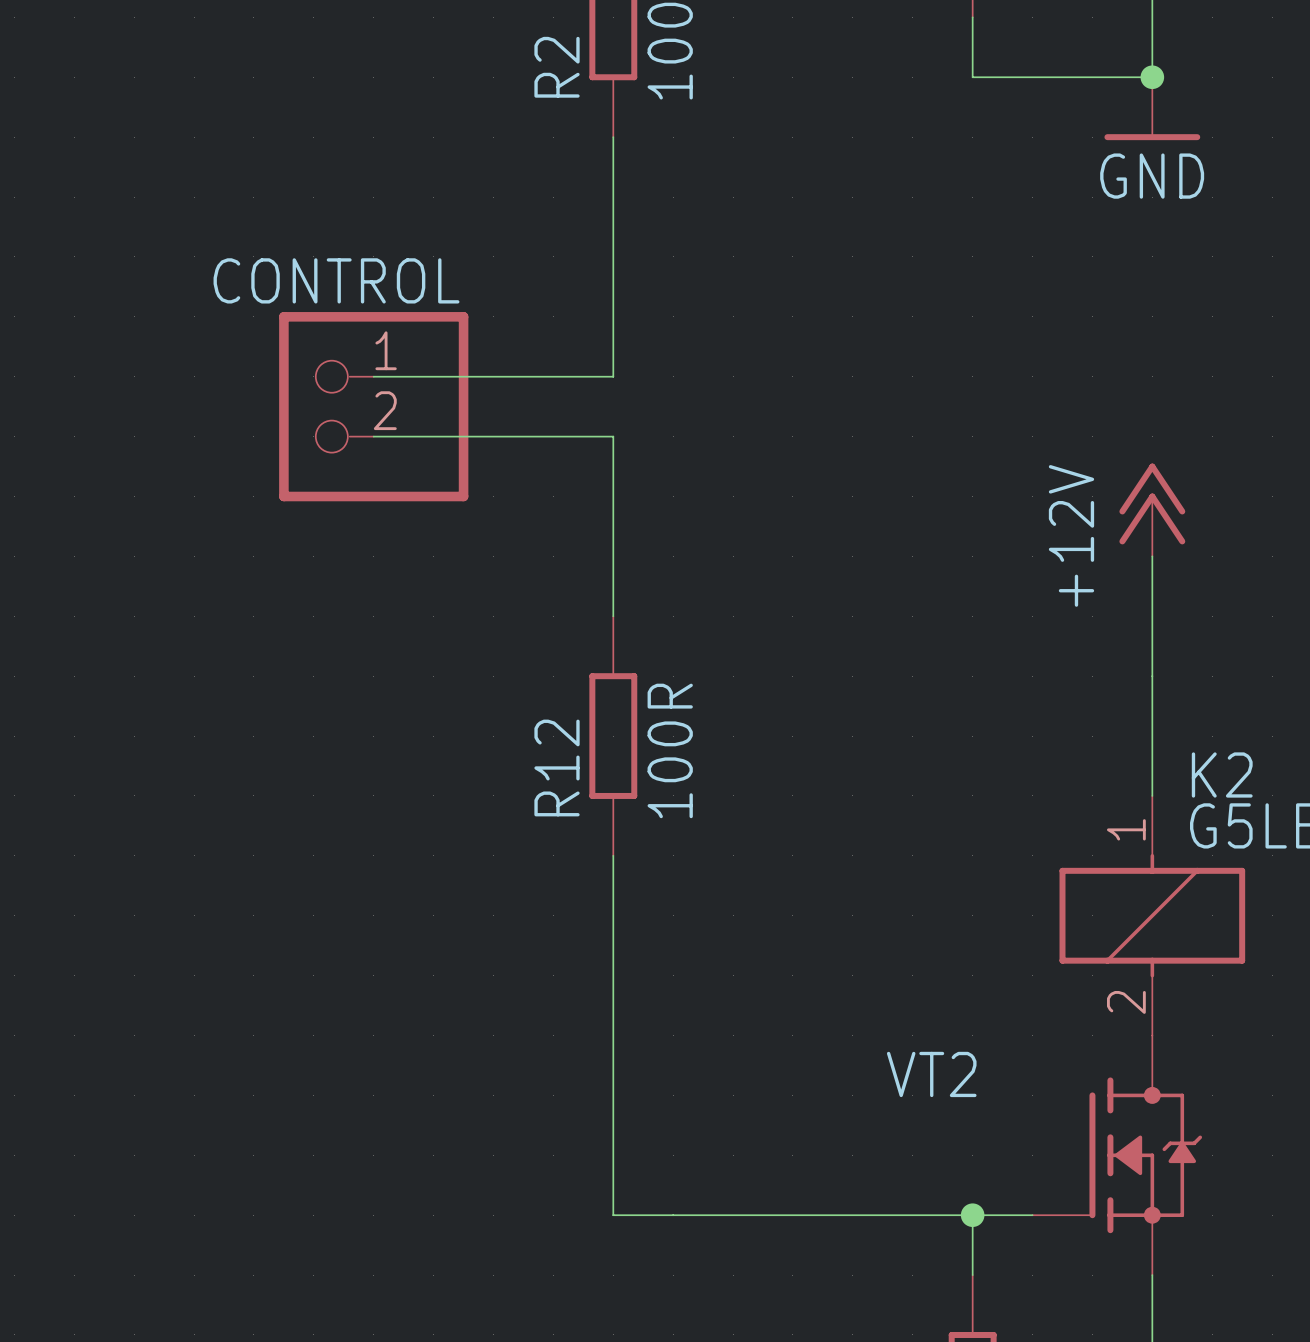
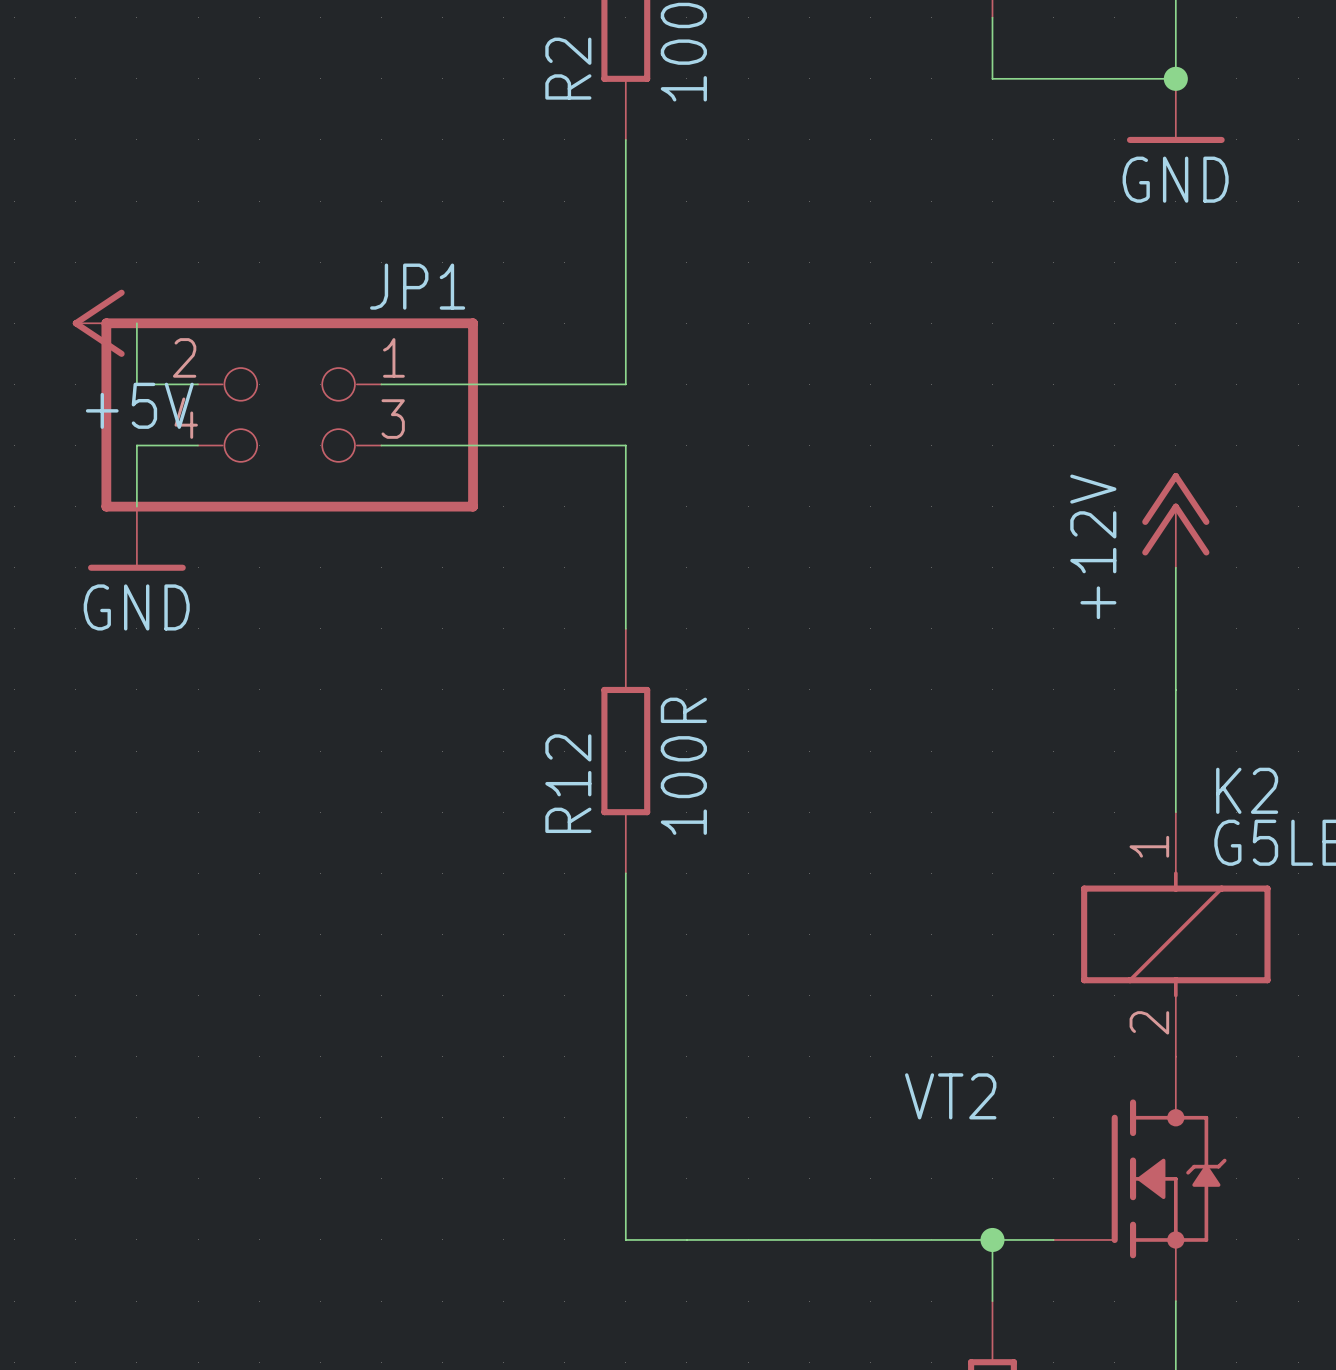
power symbol: none -> +5V (104, 323)
wire: none -> (136, 323) (136, 384) (198, 384)
JP1: none -> (289, 414)
CONTROL: (373, 406) -> none
wire: none -> (198, 445) (136, 445) (136, 506)
power symbol: none -> GND (136, 538)

